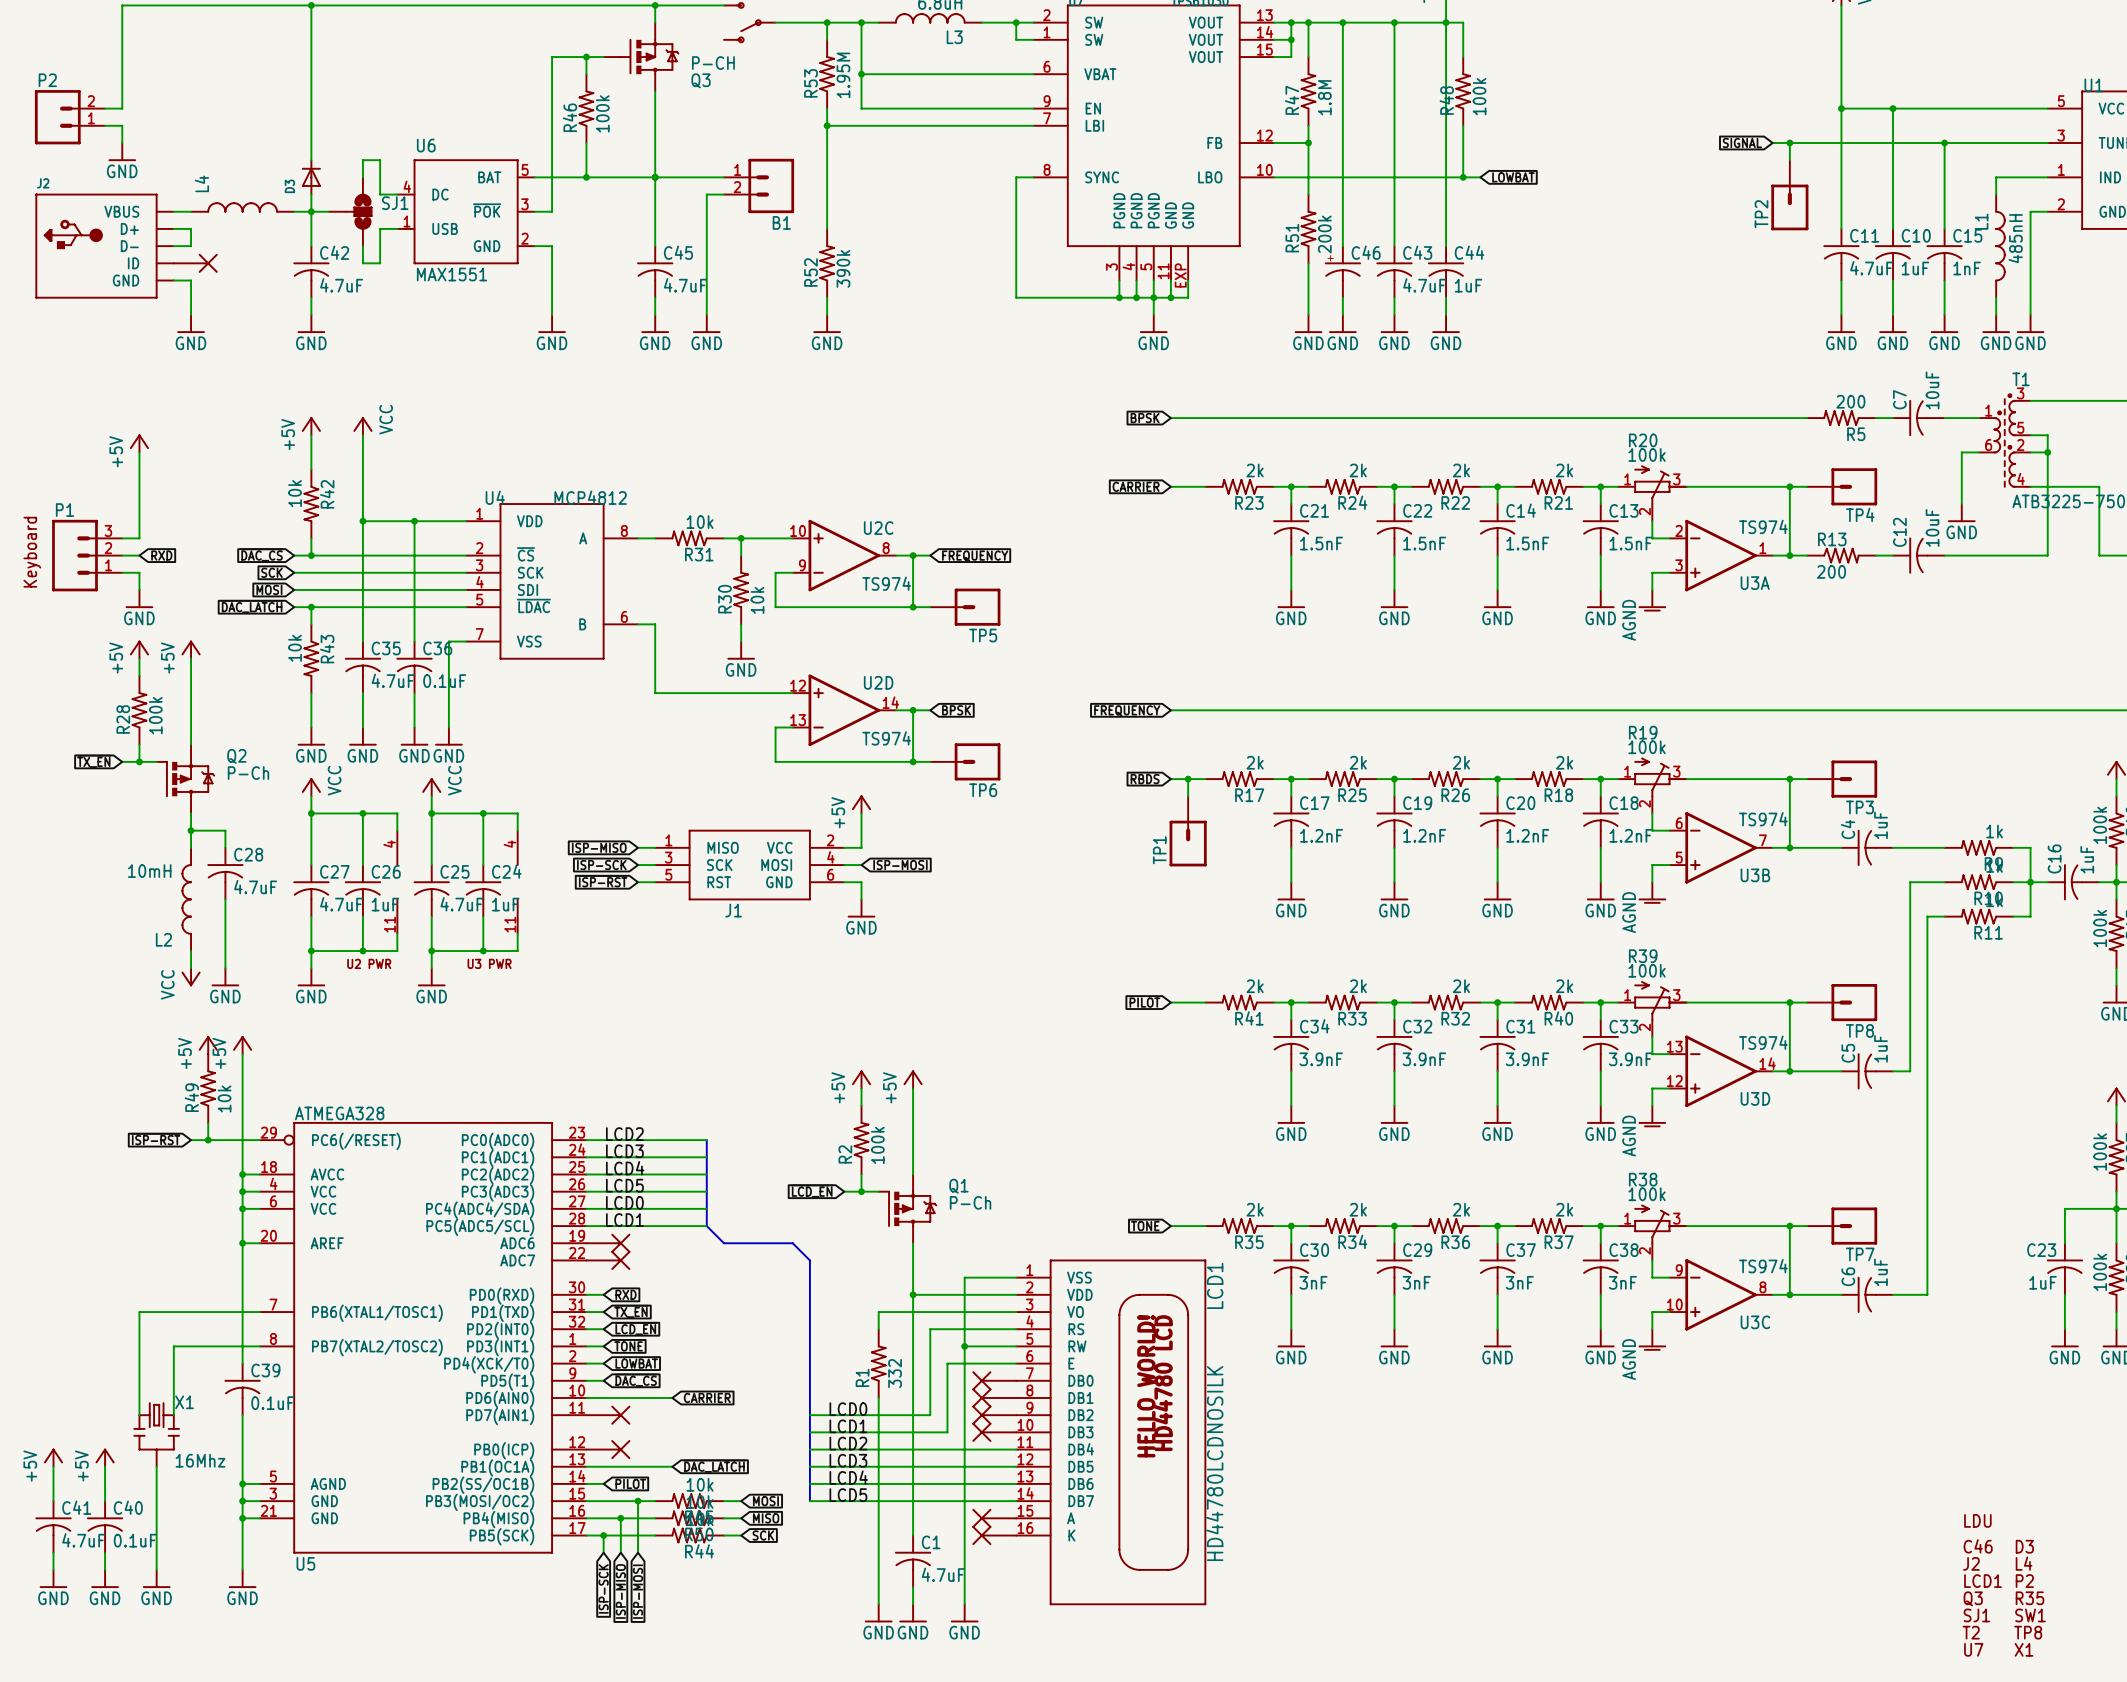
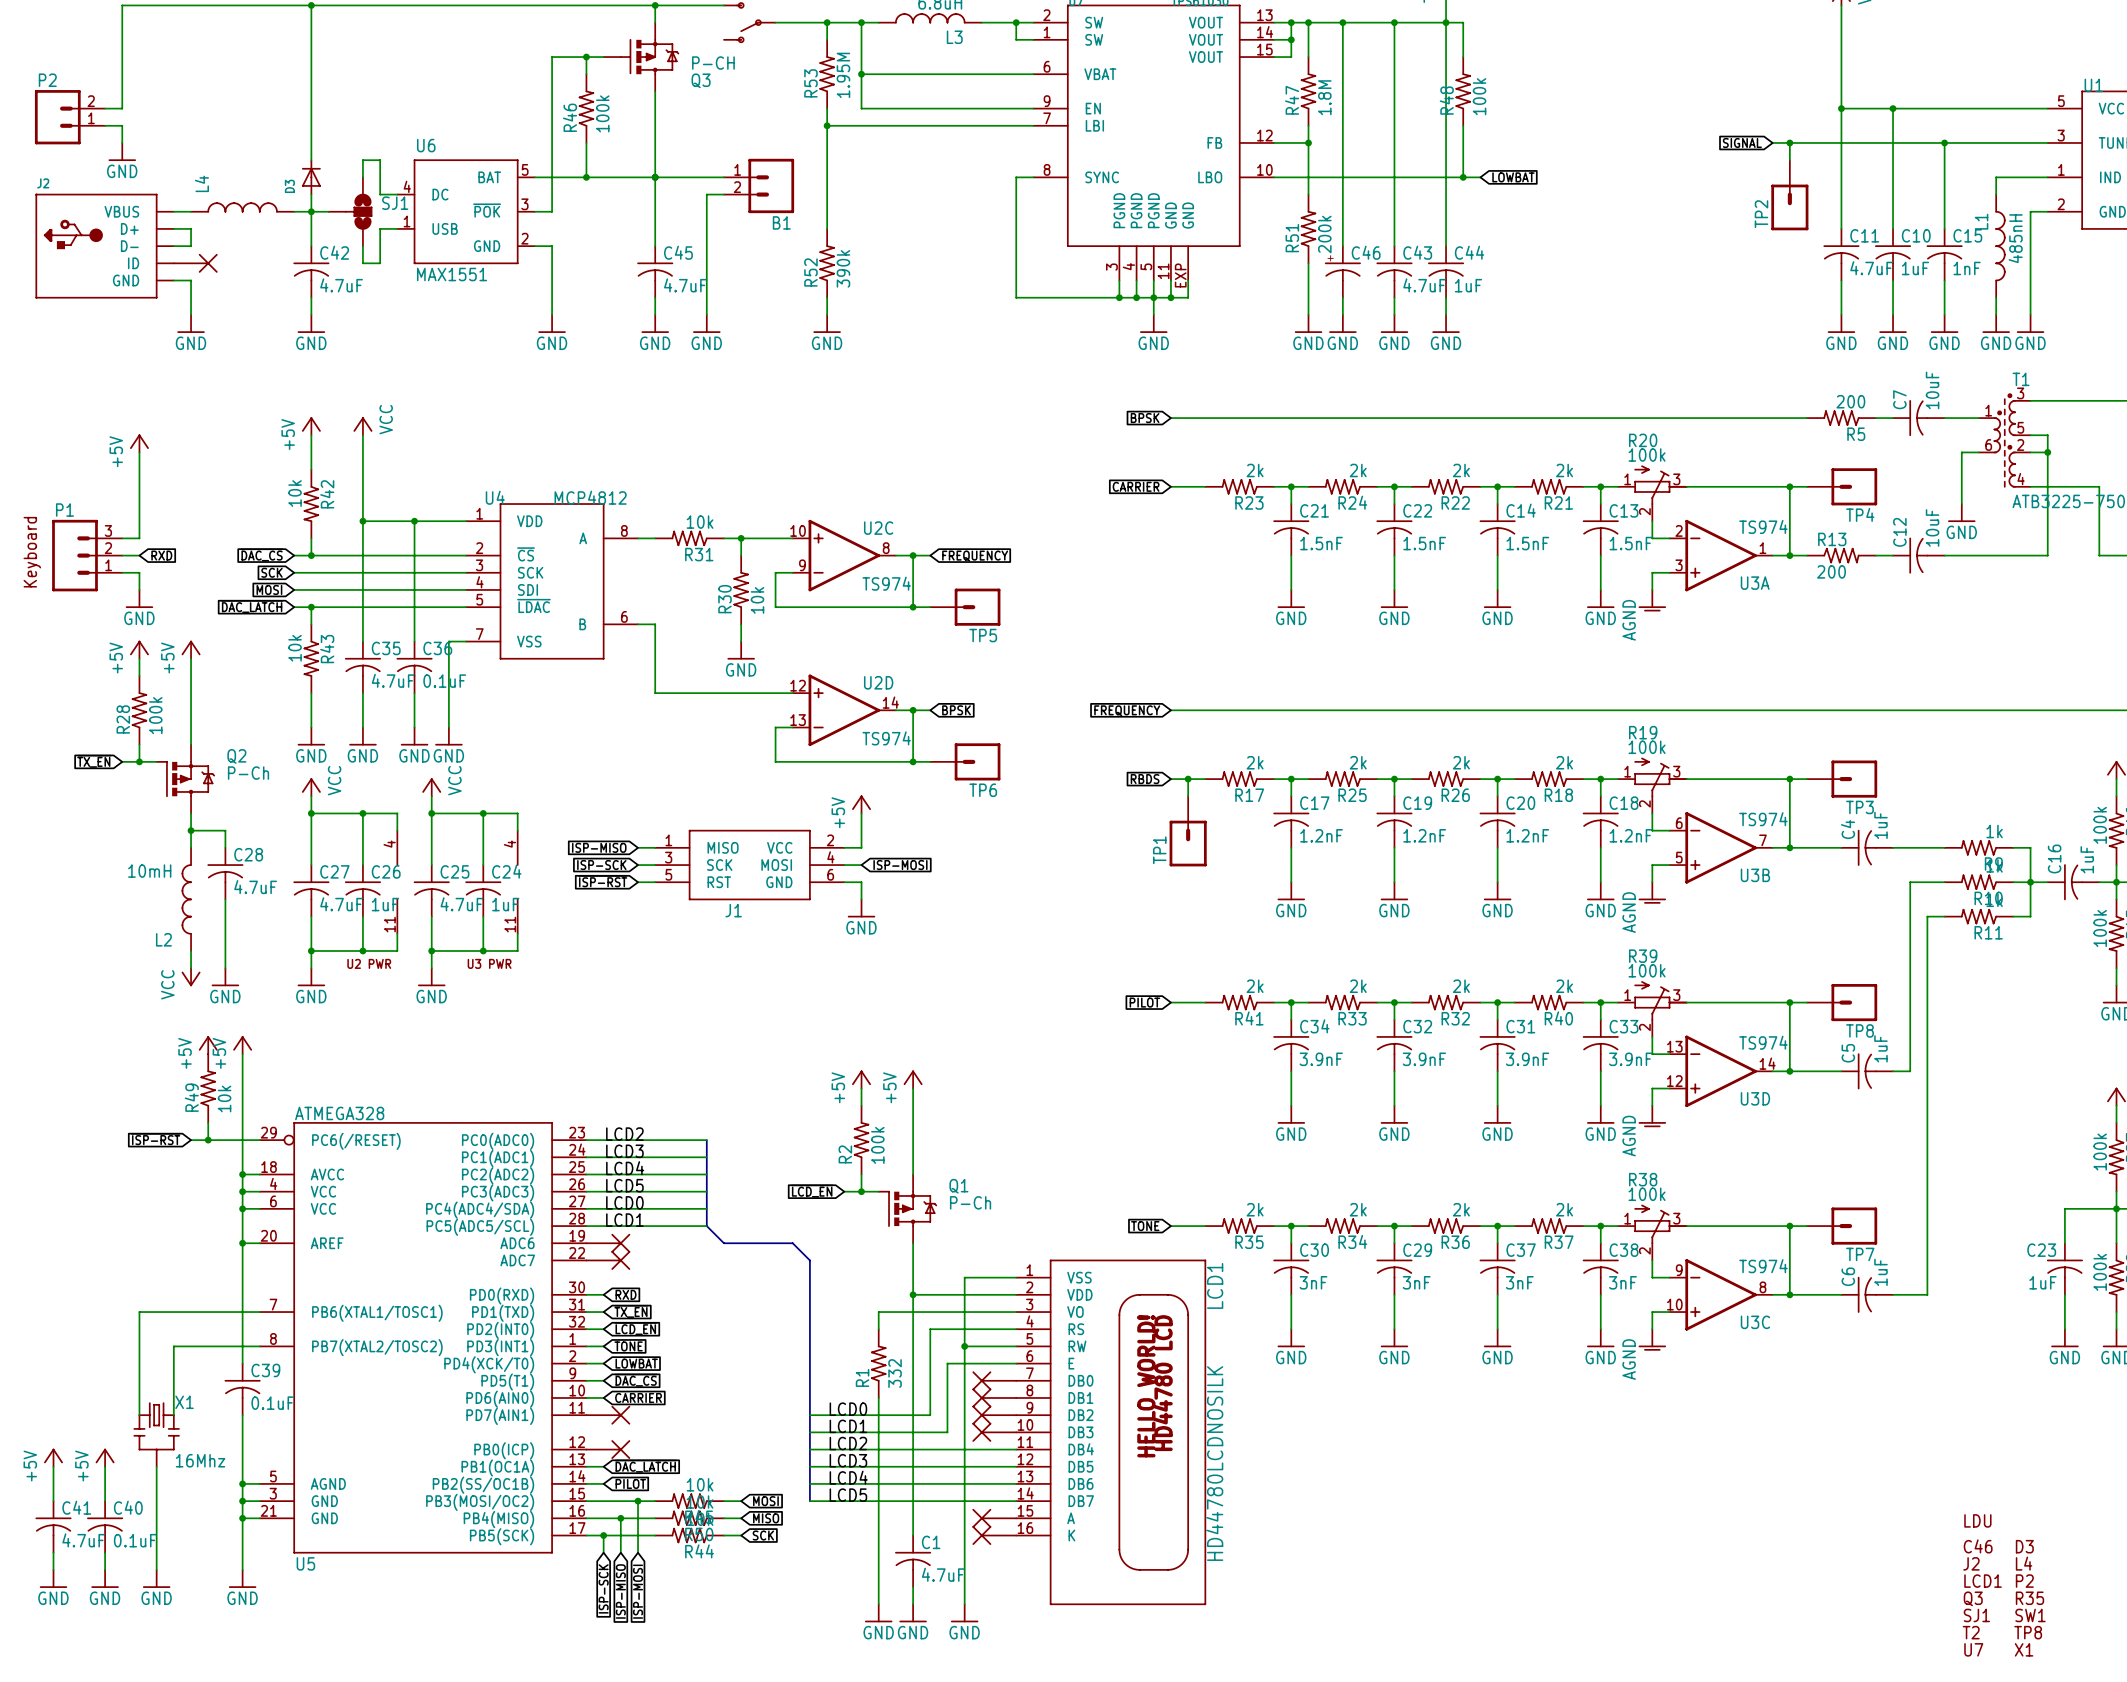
wire: (603, 1397) (672, 1397) -> none
global label position: CARRIER (707, 1397) -> CARRIER (638, 1397)
wire: (603, 1466) (672, 1466) -> none
global label position: ~{DAC_LATCH} (714, 1466) -> ~{DAC_LATCH} (645, 1466)

